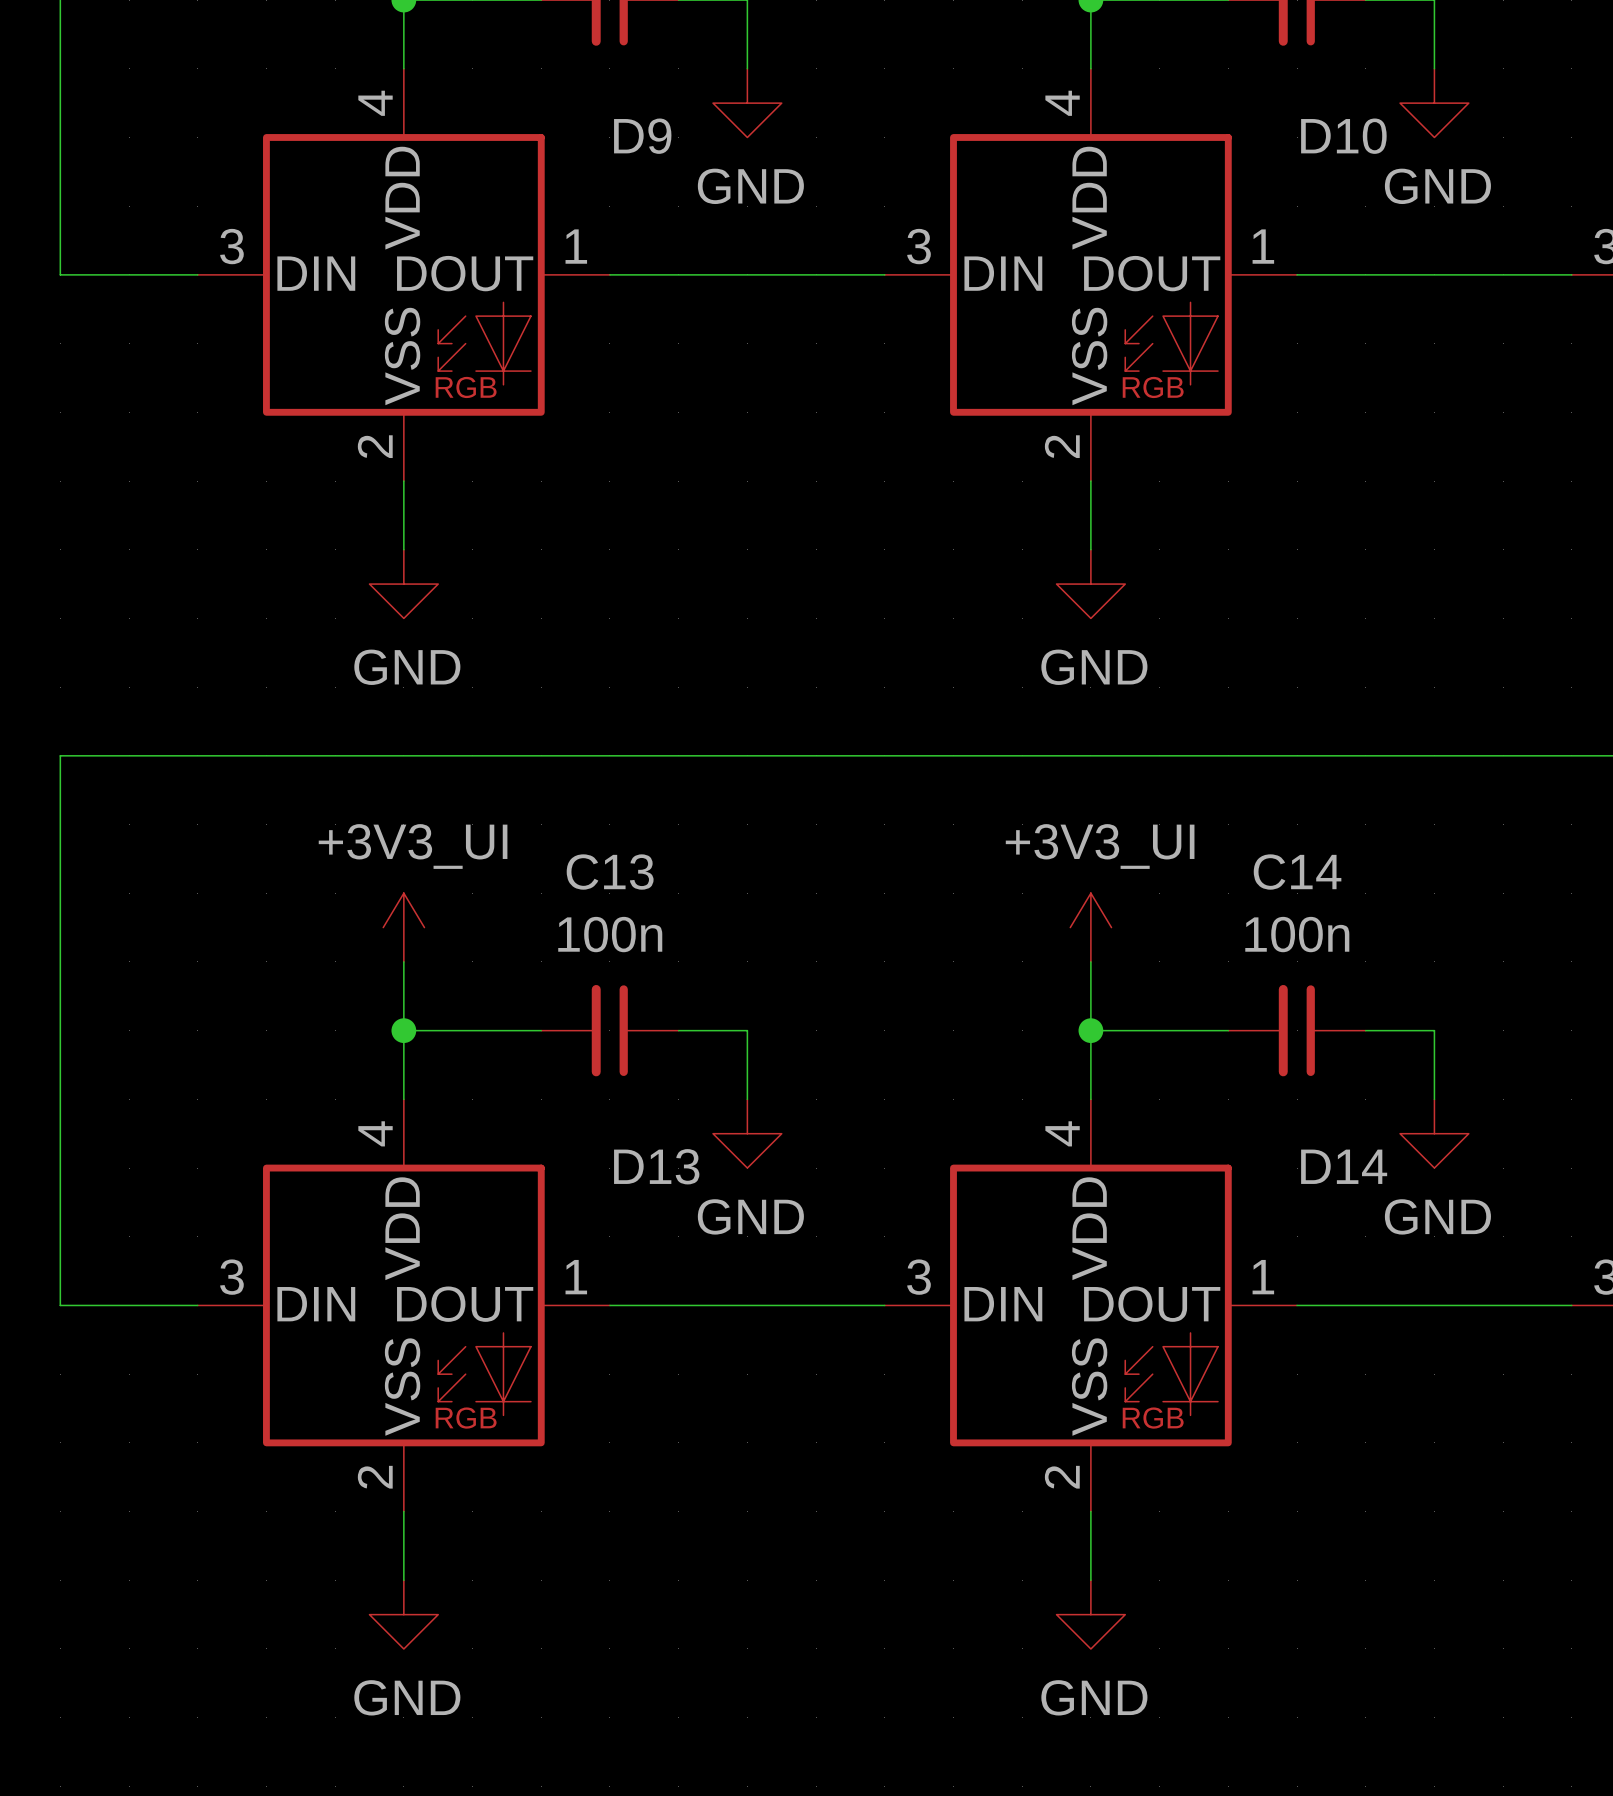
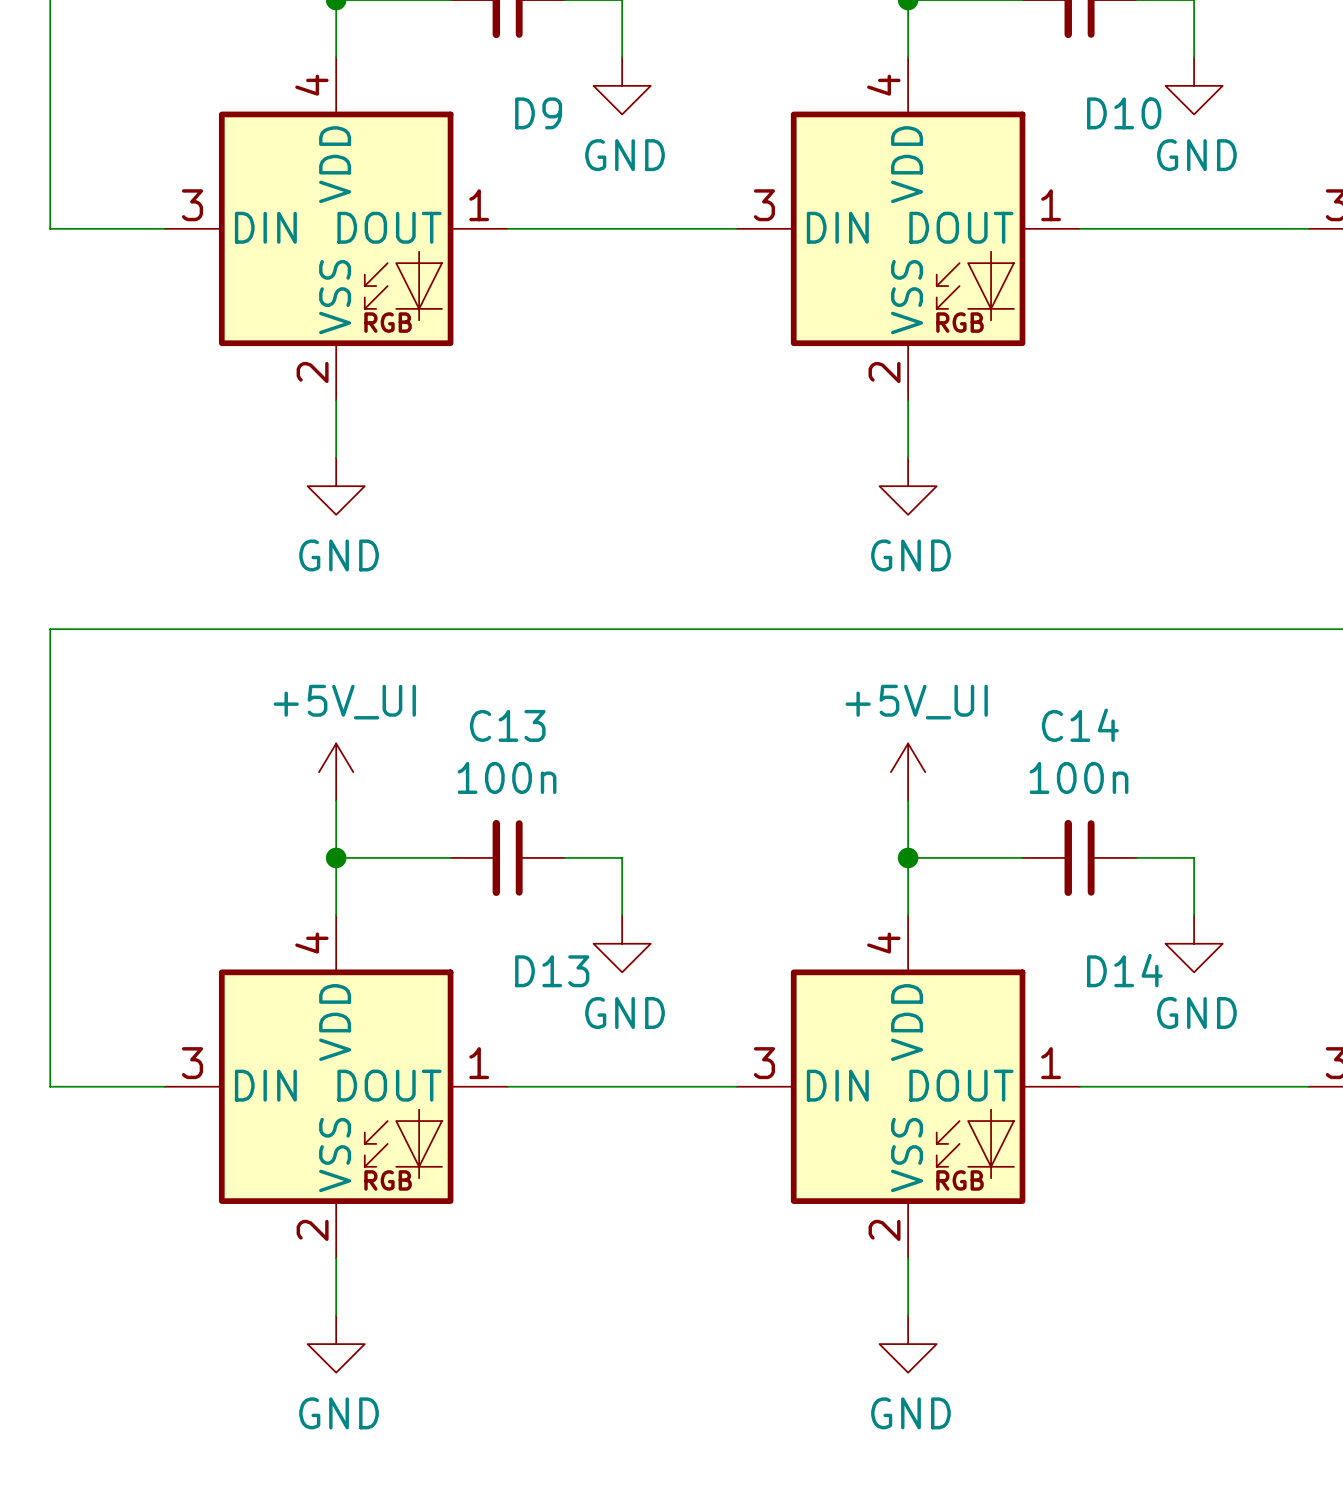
power symbol: +3V3_UI (403, 927) -> +5V_UI (336, 772)
power symbol: +3V3_UI (1090, 927) -> +5V_UI (908, 772)

